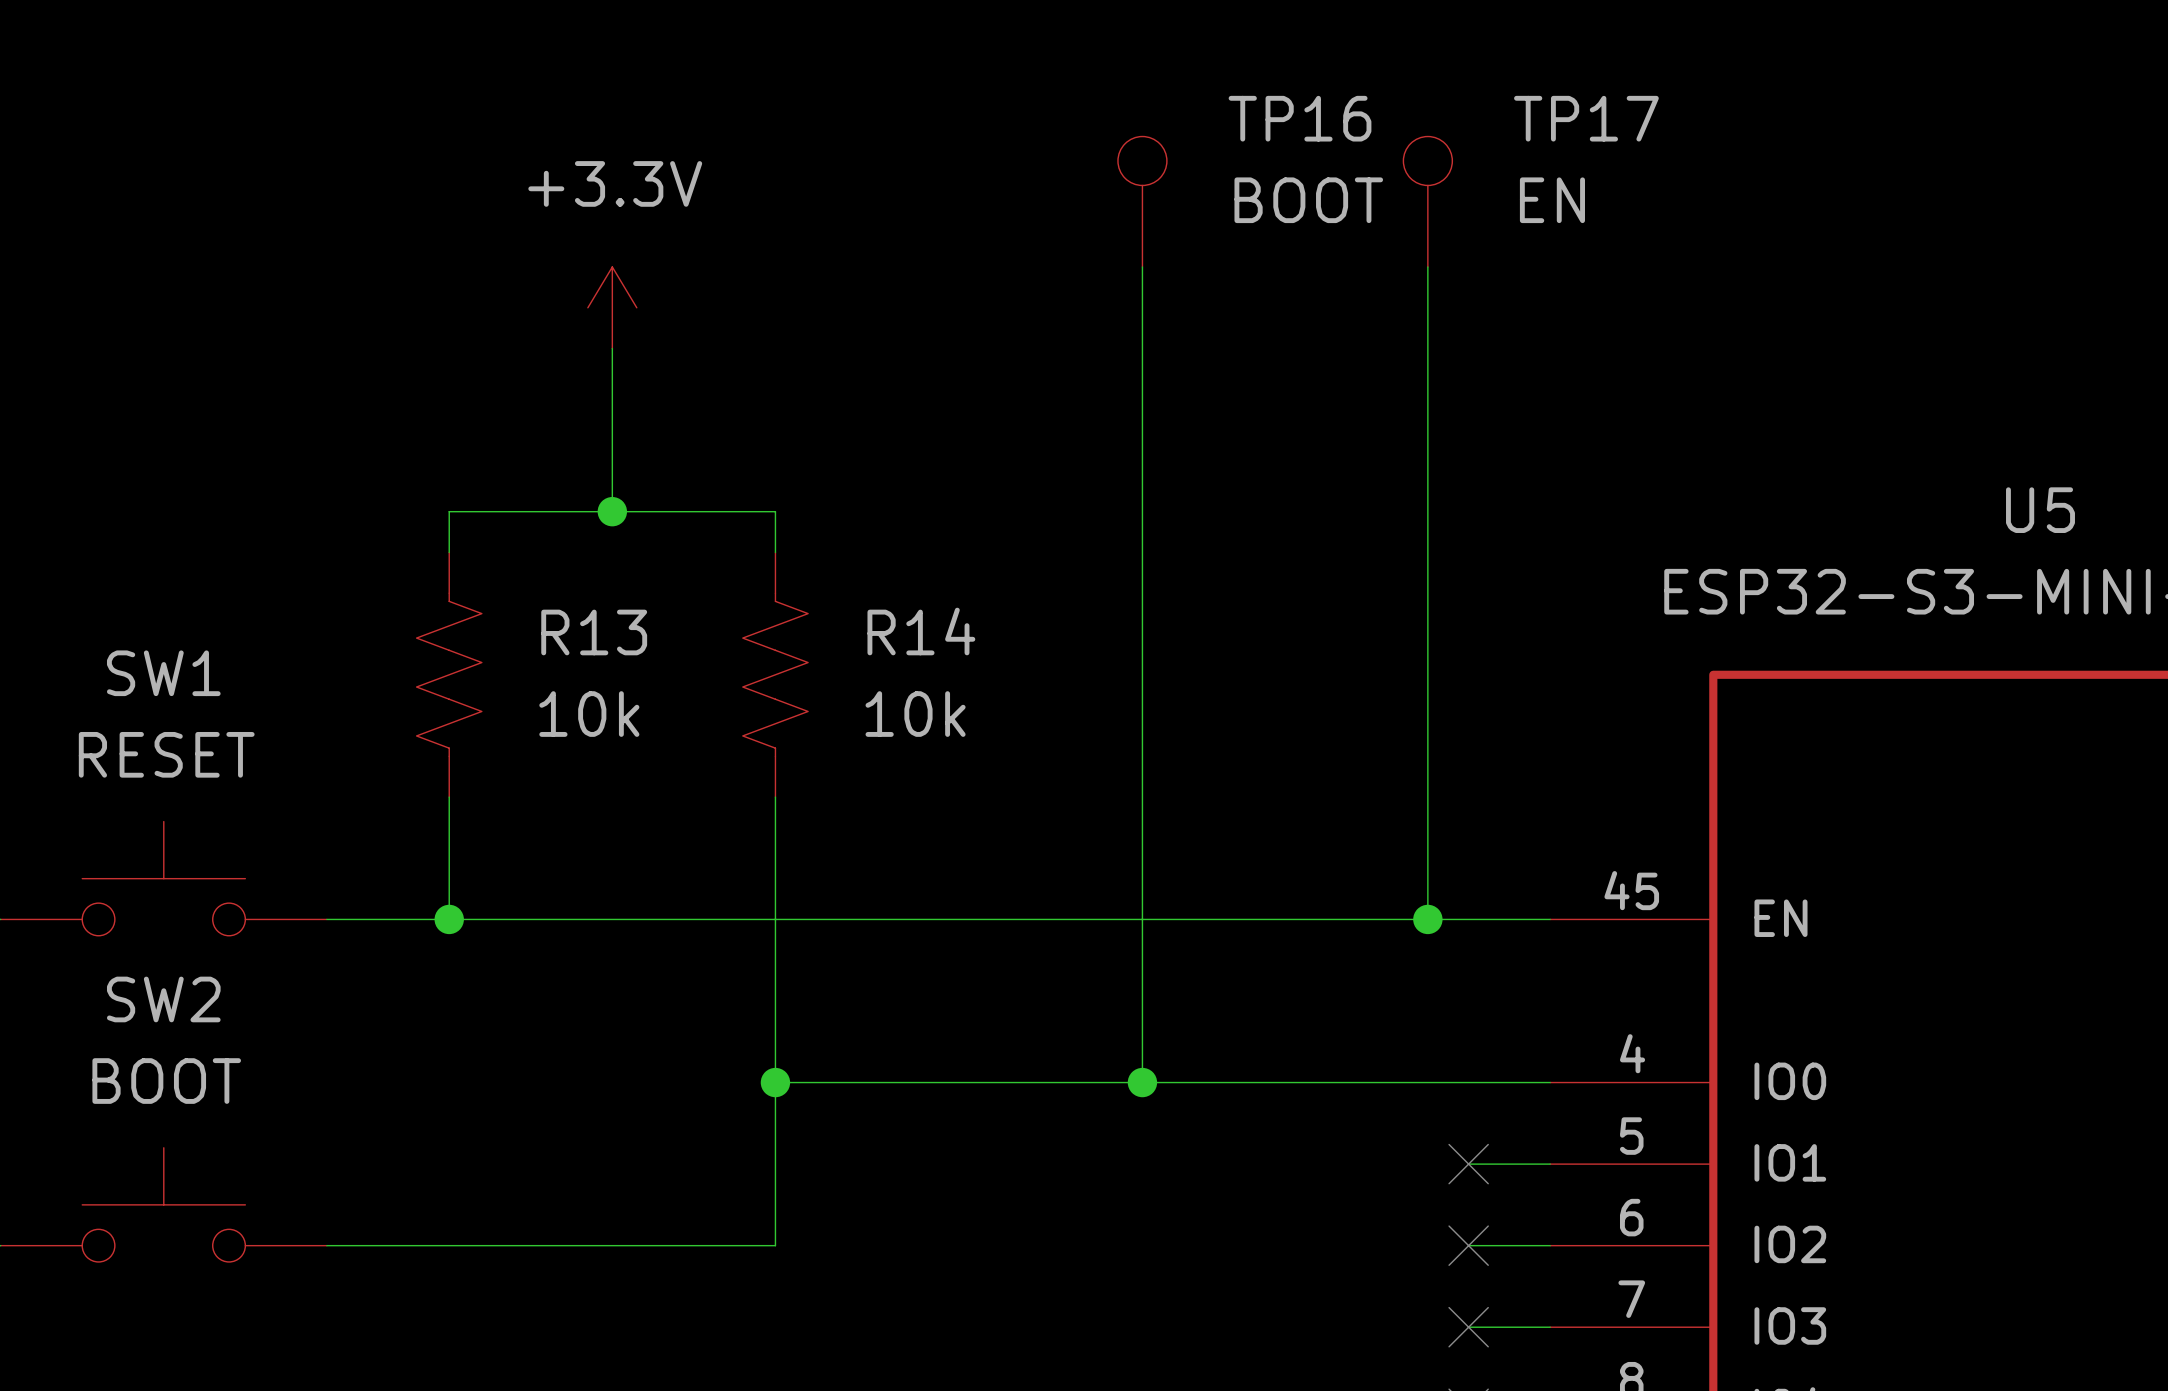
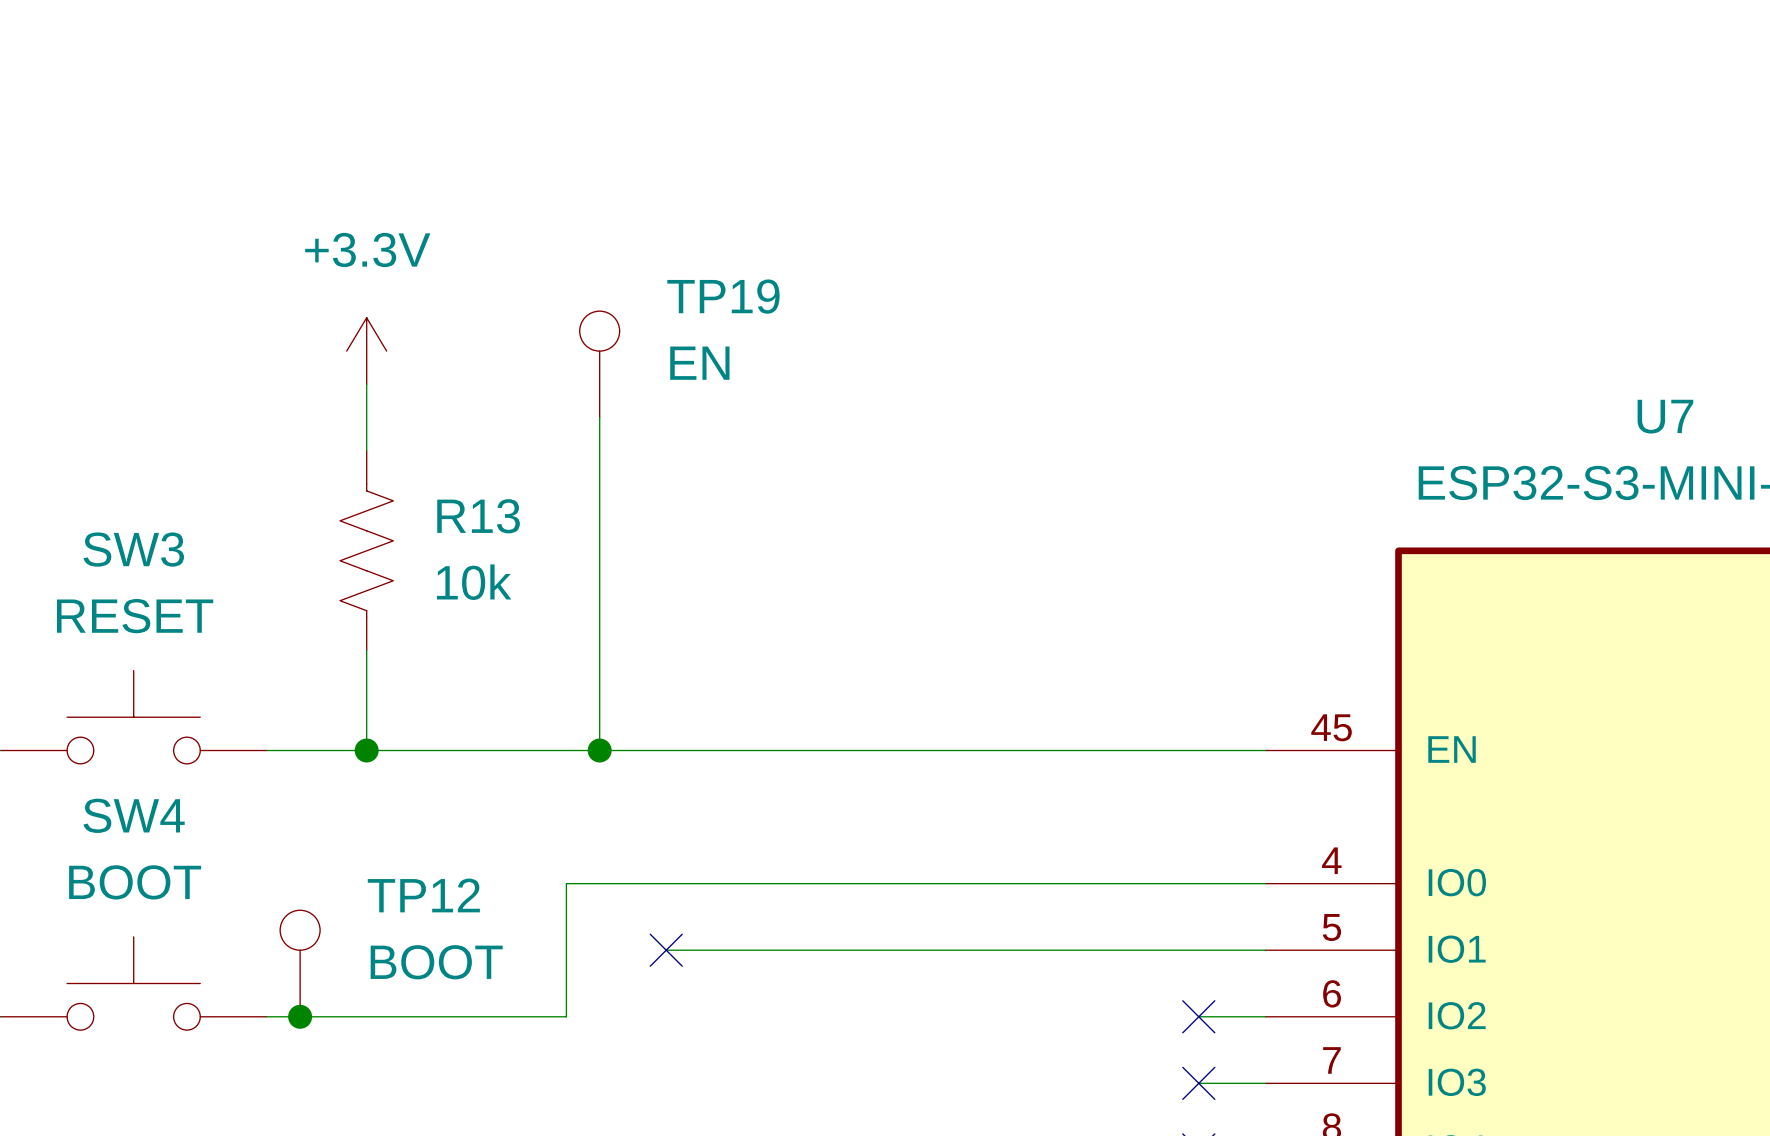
TP16: BOOT (1142, 201) -> none
TP17: EN (1427, 201) -> none
wire: (1142, 267) (1142, 1082) -> none
wire: (1427, 267) (1427, 919) -> none
power symbol position: +3.3V (612, 307) -> +3.3V (366, 351)
wire: (612, 348) (612, 511) -> none
TP19: none -> EN (599, 364)
U5 name: U5 (2040, 510) -> U7 (1665, 416)
wire: (449, 511) (775, 511) (775, 552) -> (366, 417) (366, 384)
junction: (612, 511) -> none
wire: none -> (599, 417) (599, 750)
SW1 name: SW1 (163, 673) -> SW3 (133, 549)
R14: 10k (775, 674) -> none
wire: (775, 797) (775, 1245) (693, 1245) -> (632, 883) (566, 883) (566, 1016)
junction: (1427, 919) -> none
SW2 name: SW2 (163, 999) -> SW4 (134, 815)
junction position: (775, 1082) -> (599, 750)
junction: (1142, 1082) -> none
wire: none -> (666, 950) (1198, 950)
no-connect mark: none -> (666, 950)
no-connect mark: (1468, 1164) -> none
TP12: none -> BOOT (300, 963)
junction: none -> (300, 1016)

